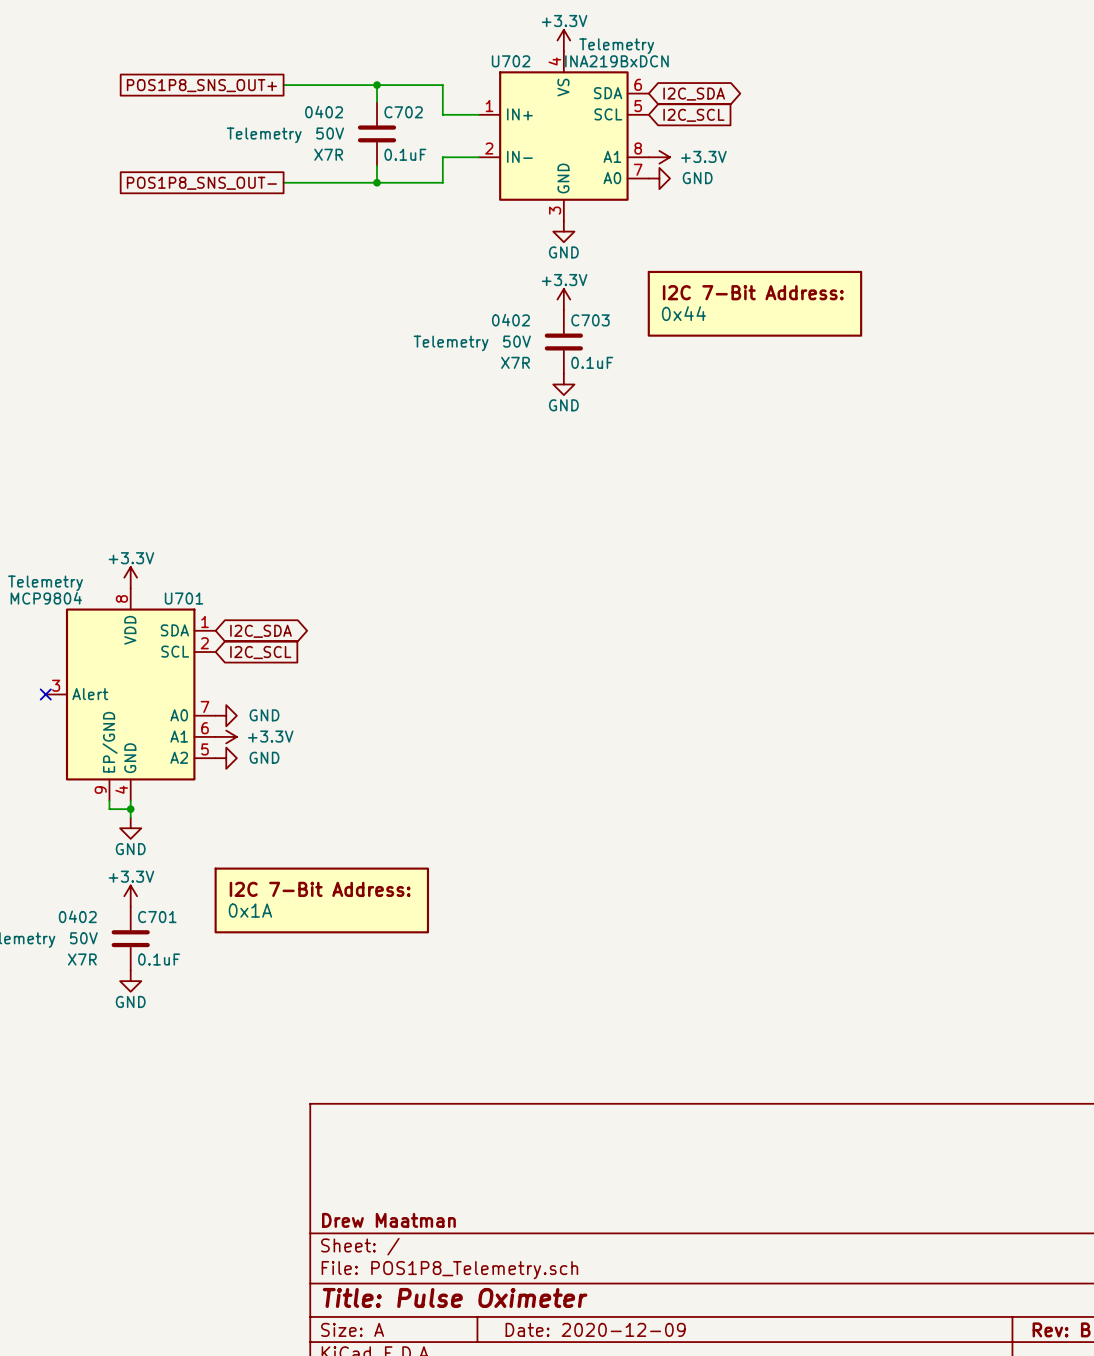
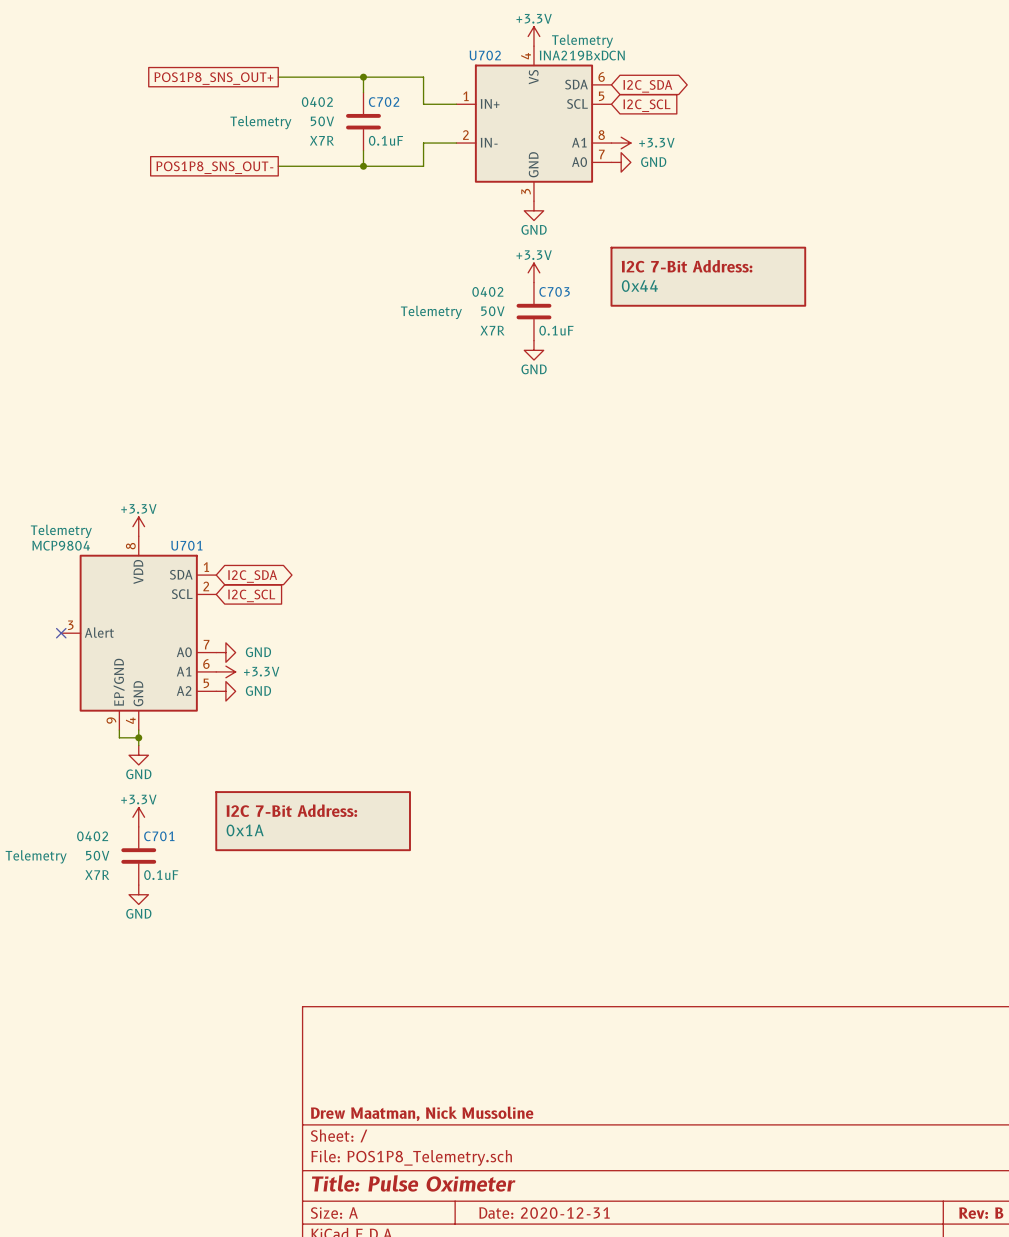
title block: Drew Maatman (388, 1220) -> Drew Maatman, Nick Mussoline (422, 1113)
title block: Date: 2020-12-09 (595, 1329) -> Date: 2020-12-31 (544, 1213)

